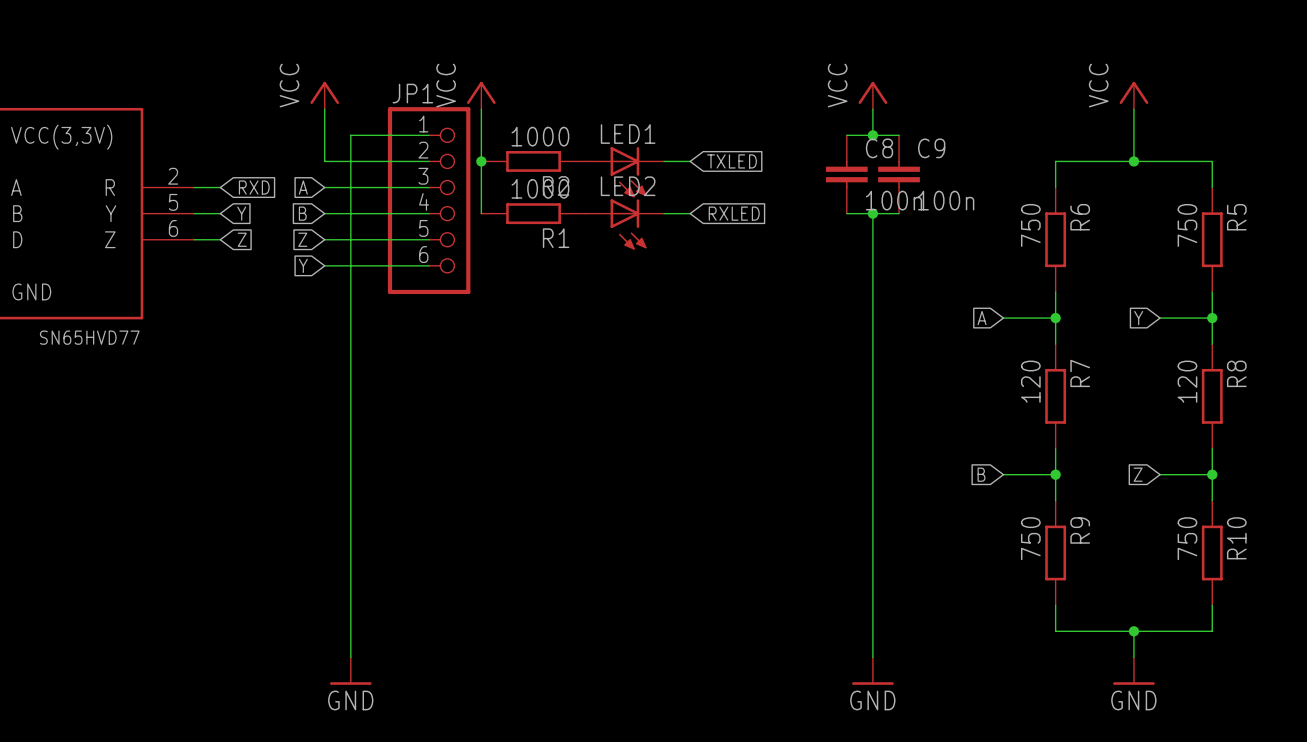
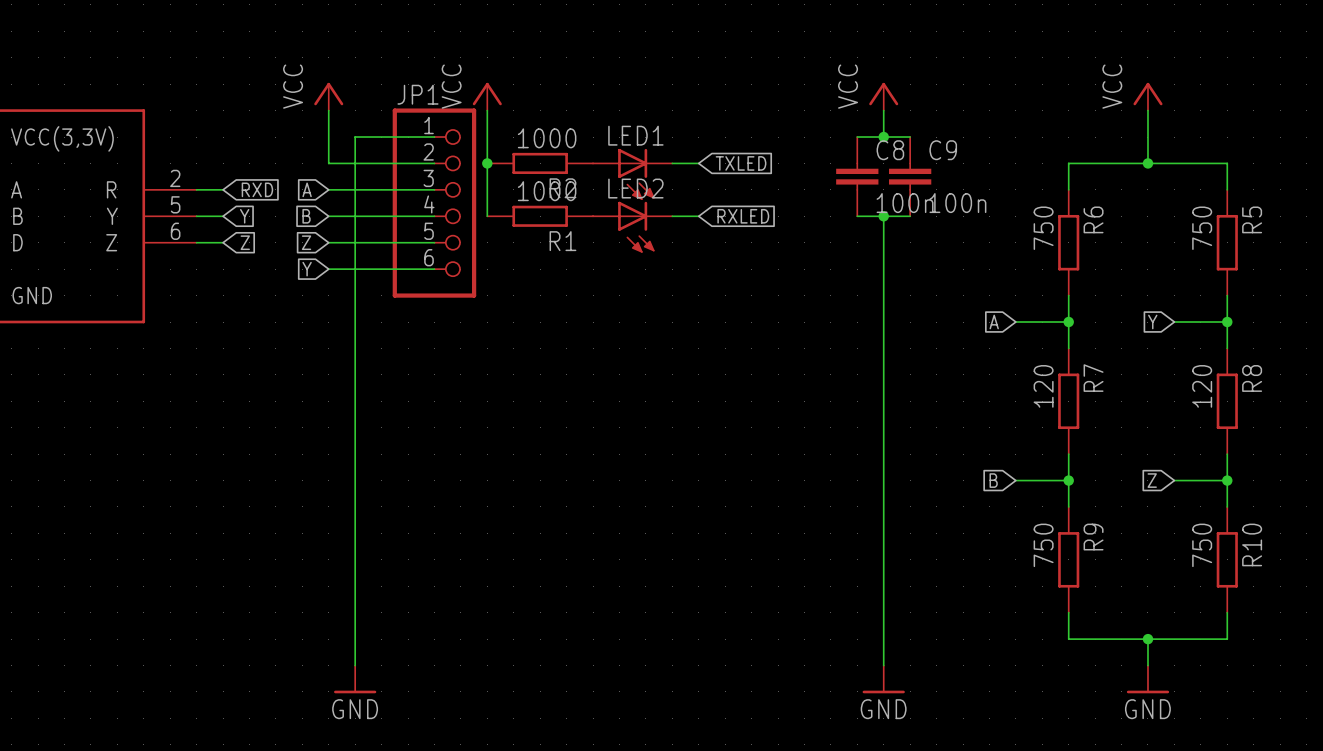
part text: SN65HVD77 (89, 337) -> none

